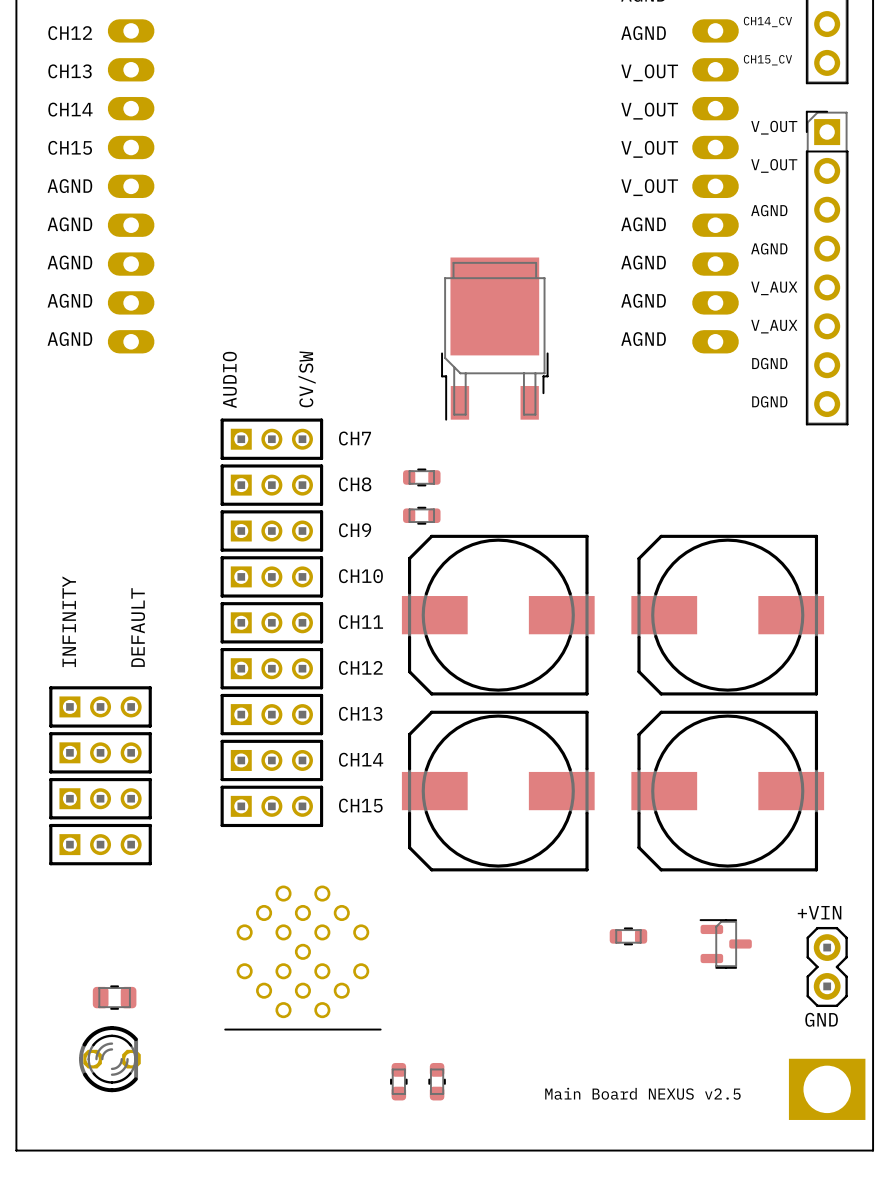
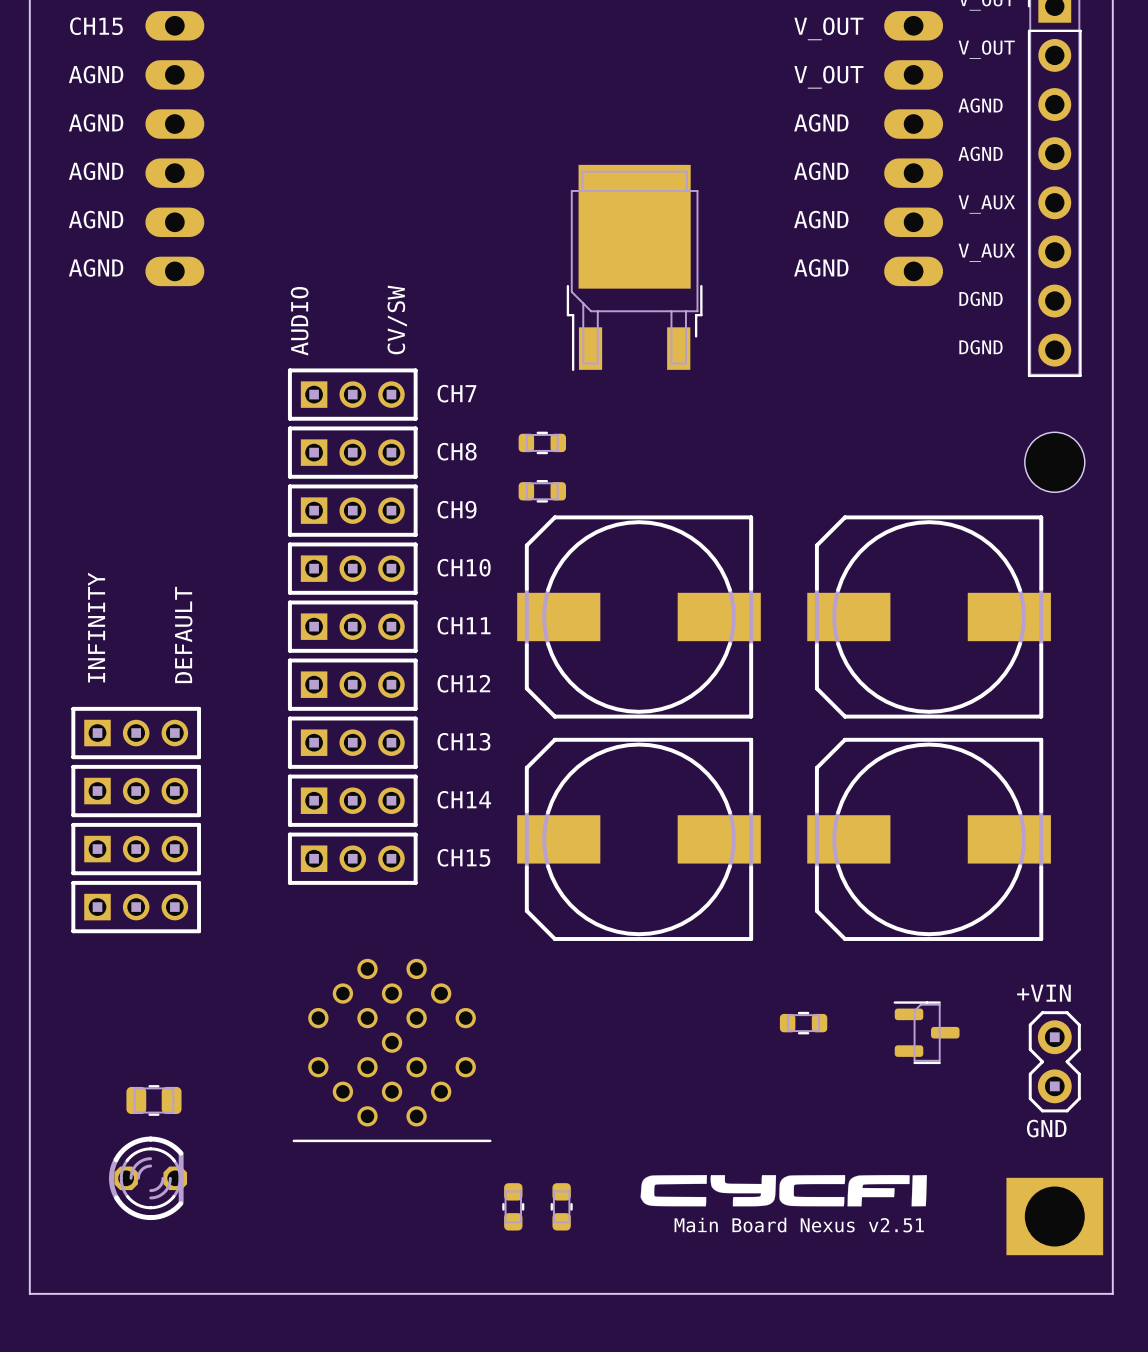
part: none -> (1054, 462)
drawing: none -> [640, 1175, 927, 1207]
text: Main Board NEXUS v2.5 (642, 1093) -> Main Board Nexus v2.51 (799, 1225)

